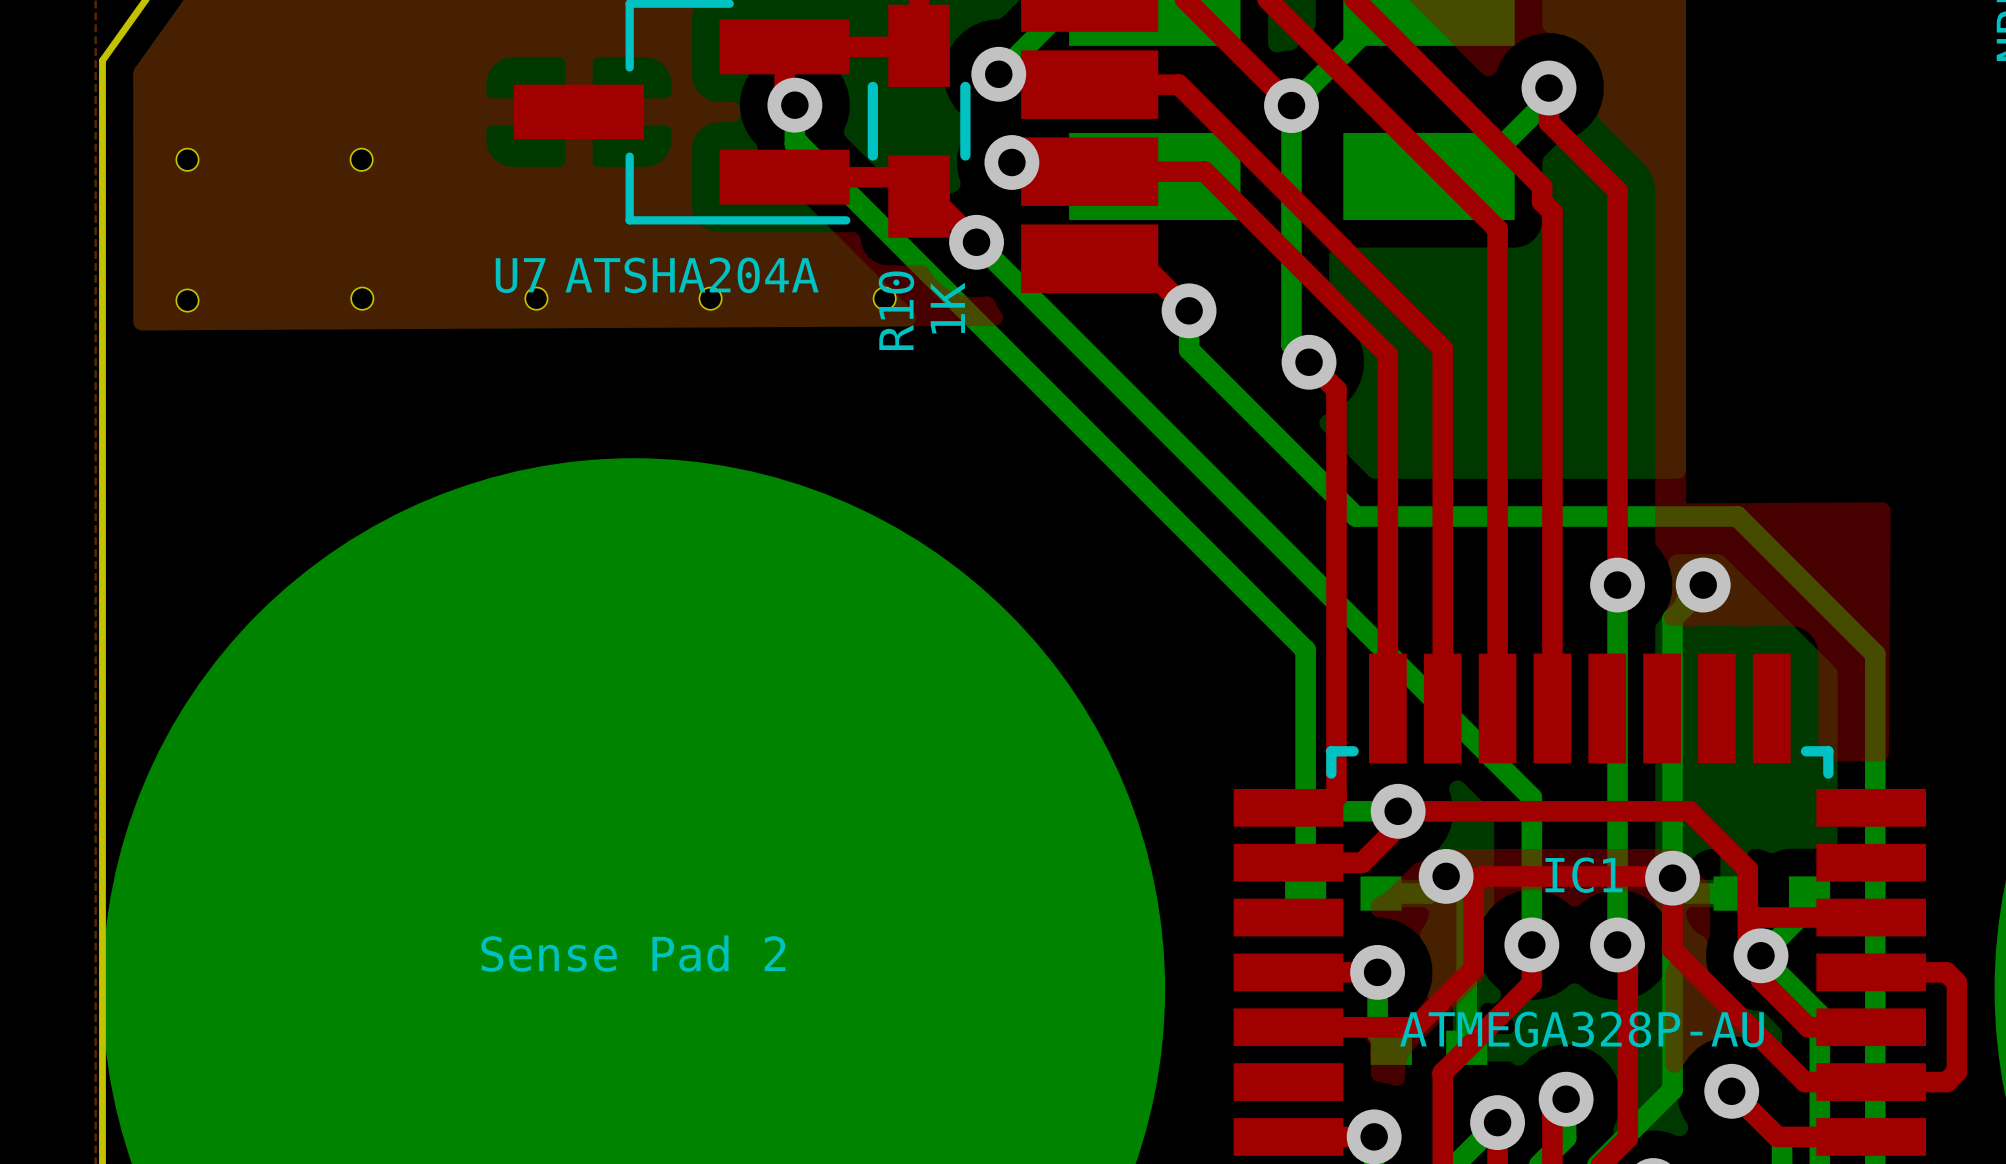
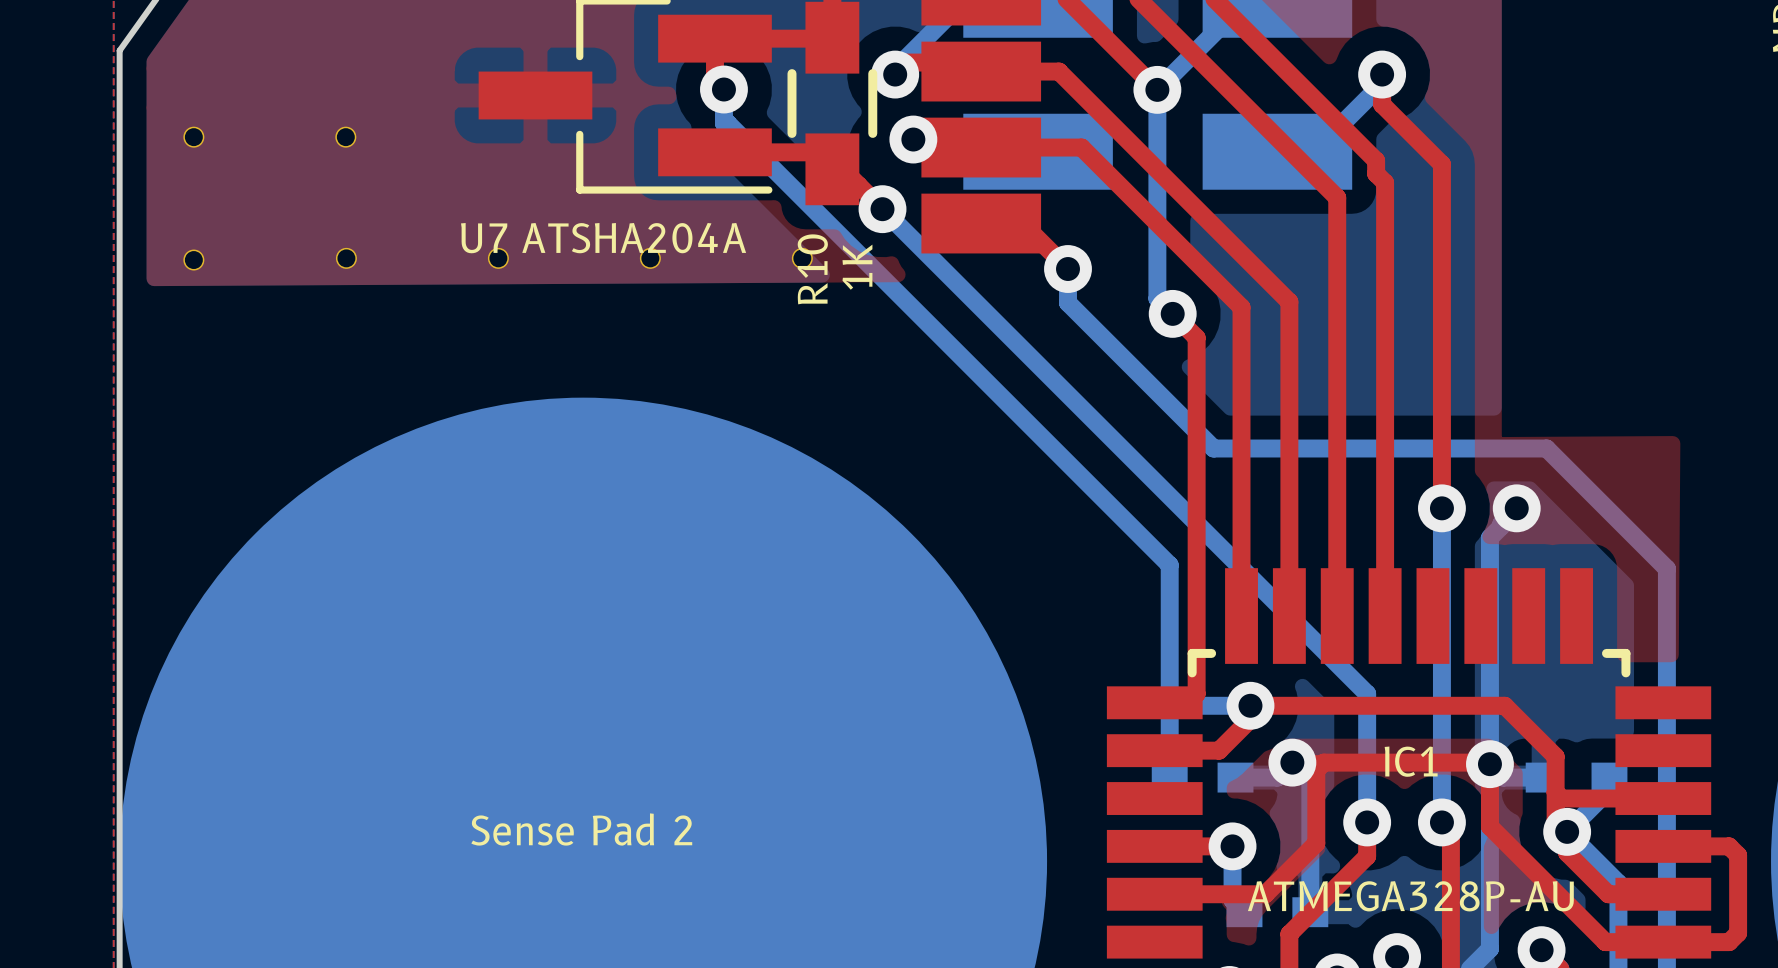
via position: (998, 74) -> (895, 74)

